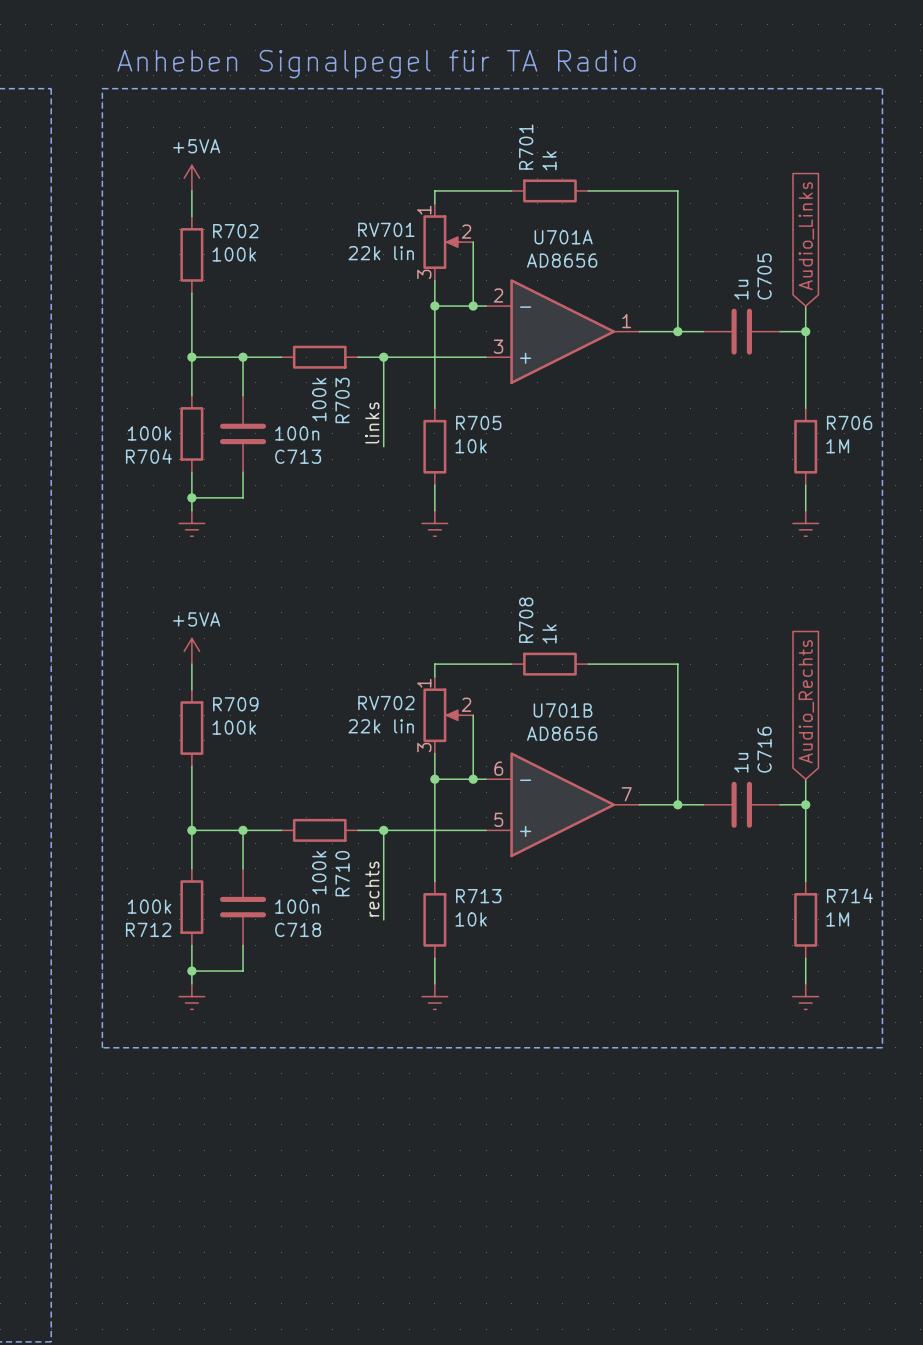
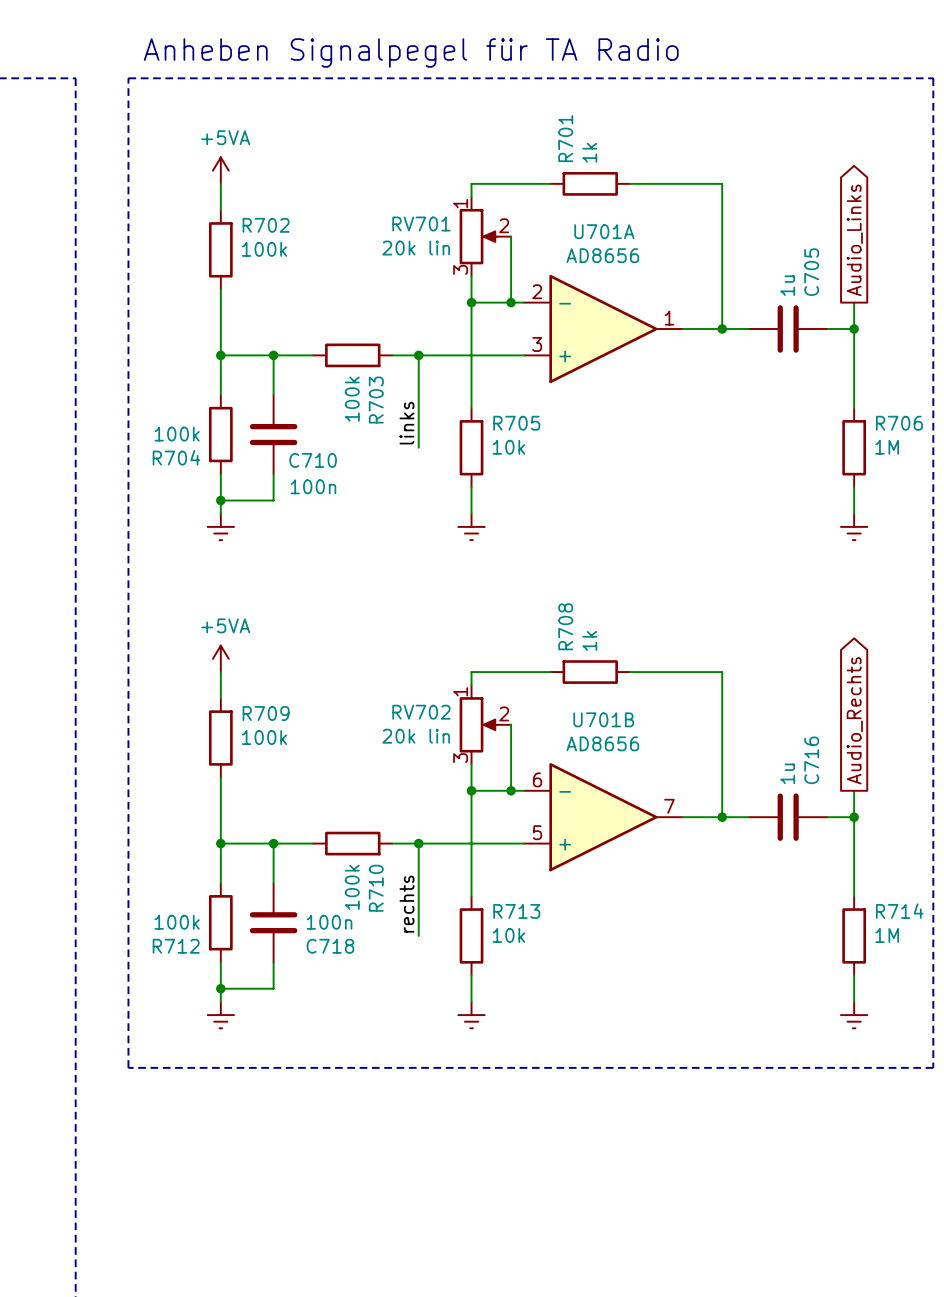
global label shape: input (806, 236) -> output (854, 240)
RV701 value: 22k lin (381, 253) -> 20k lin (416, 248)
C713 value position: 100n (297, 433) -> 100n (313, 486)
C713 name: C713 (298, 456) -> C710 (313, 460)
global label shape: input (806, 701) -> output (854, 720)
RV702 value: 22k lin (381, 726) -> 20k lin (416, 736)

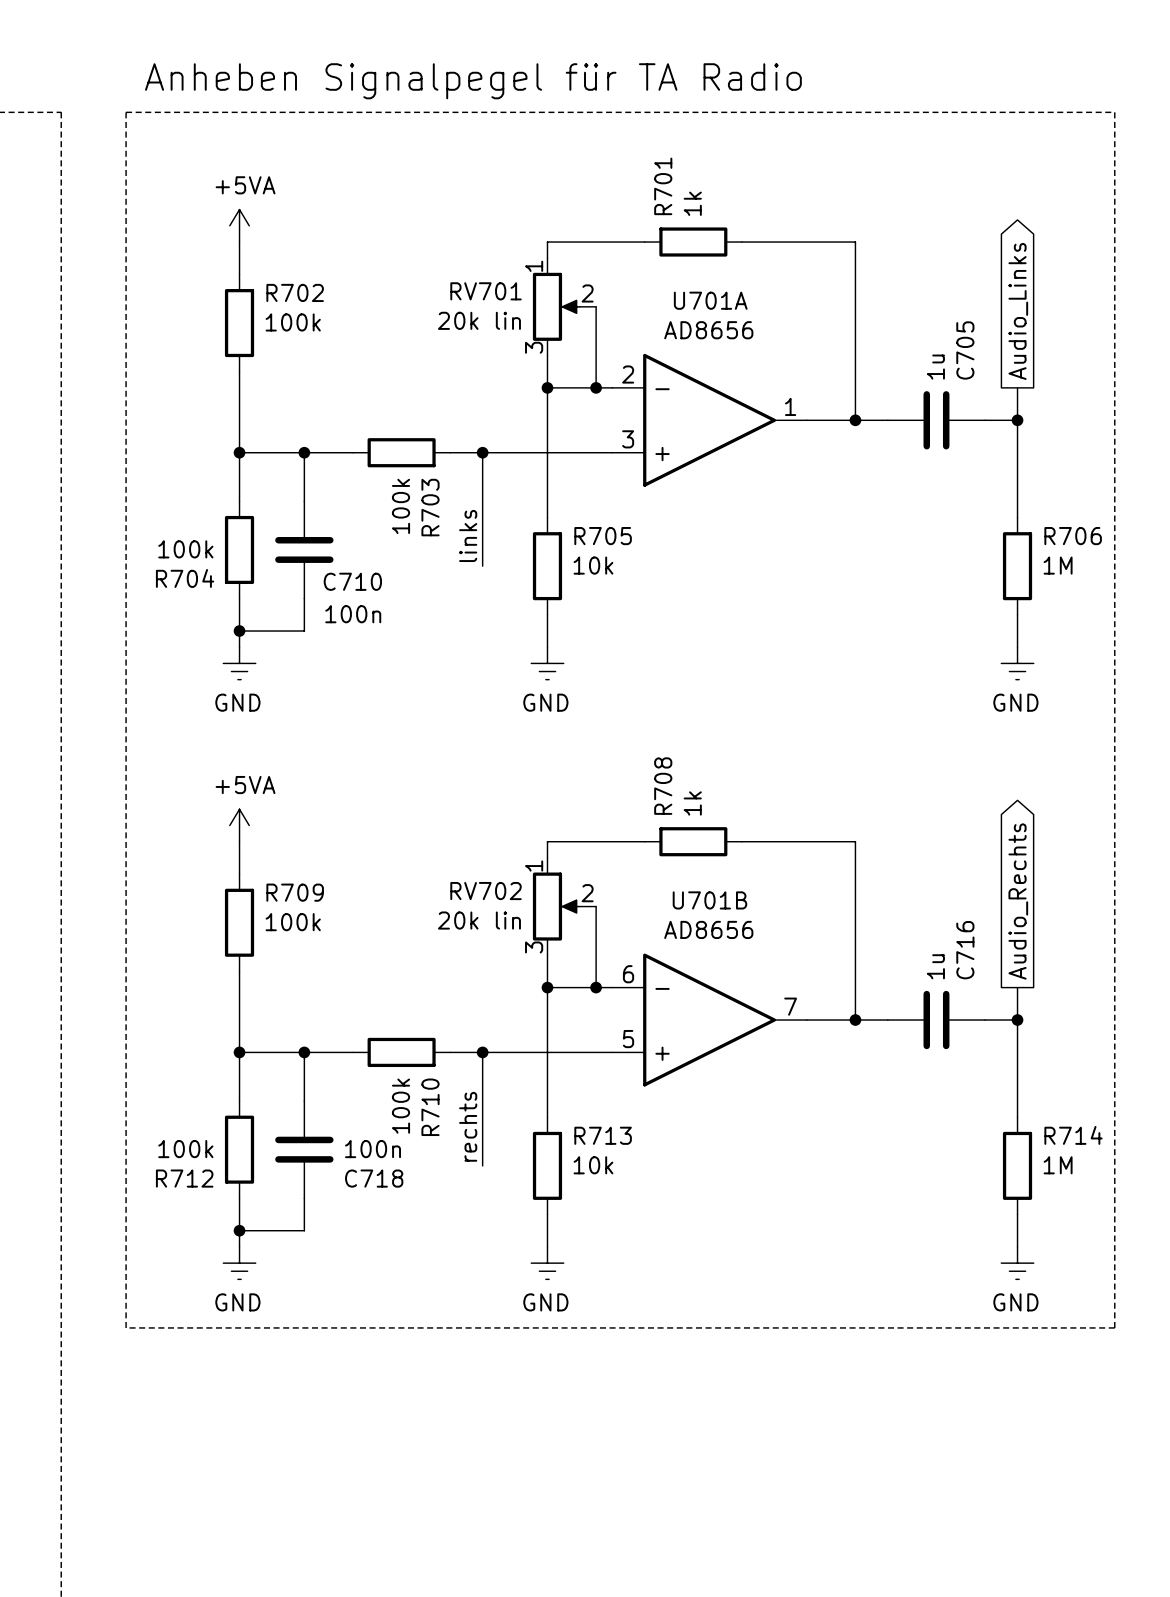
power symbol text: none -> GND (237, 702)
power symbol text: none -> GND (545, 702)
power symbol text: none -> GND (1015, 702)
power symbol text: none -> GND (237, 1302)
power symbol text: none -> GND (545, 1302)
power symbol text: none -> GND (1015, 1302)

